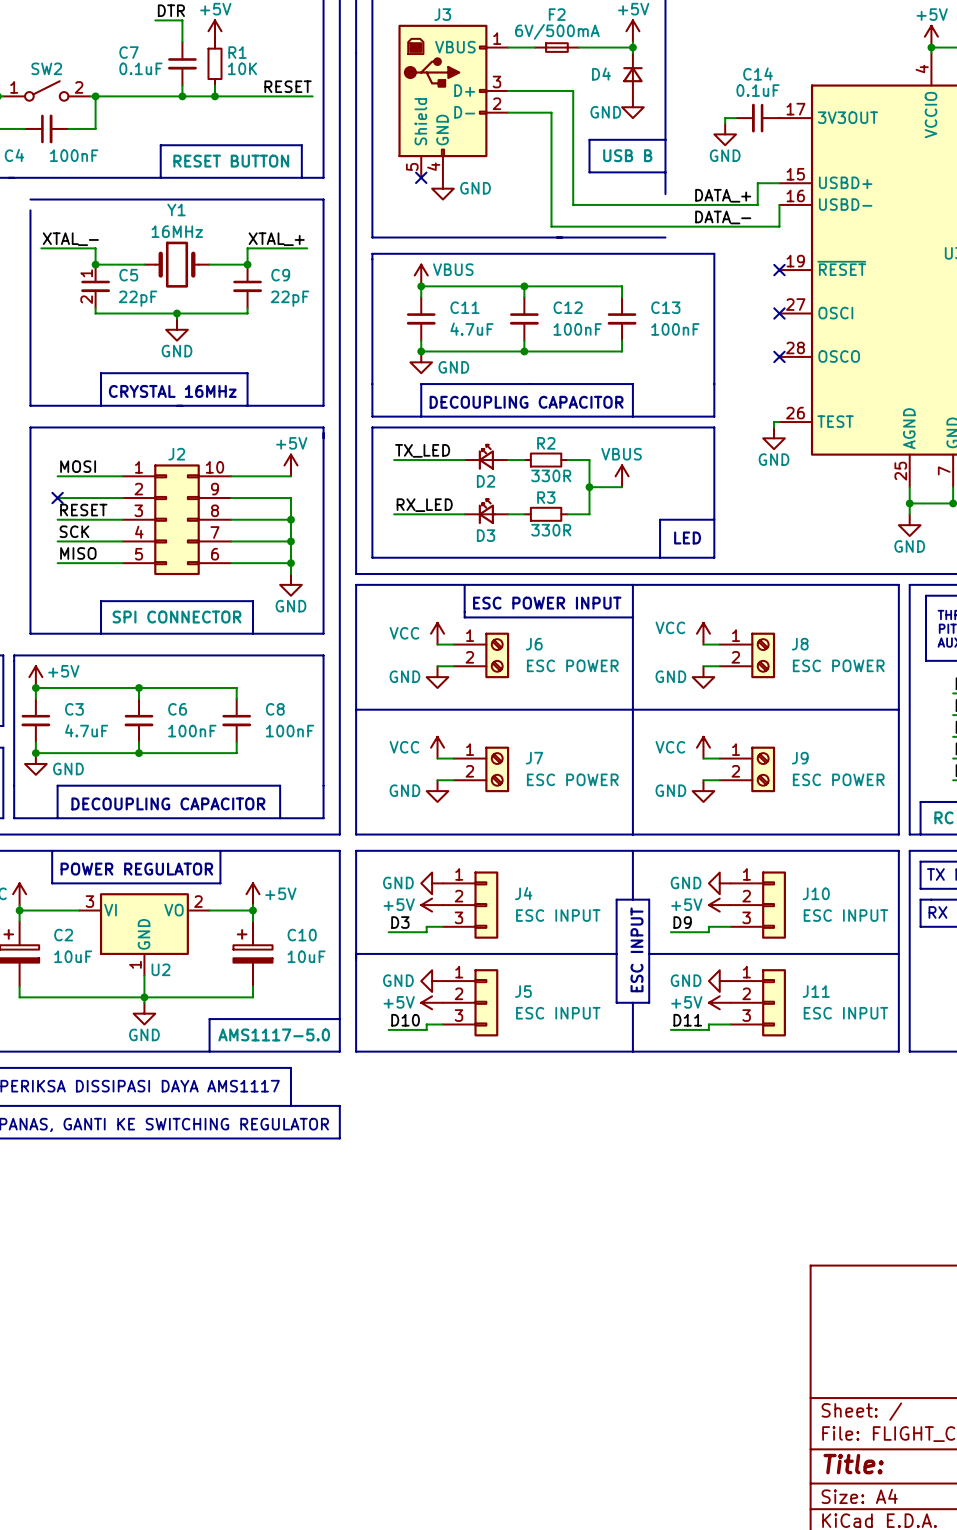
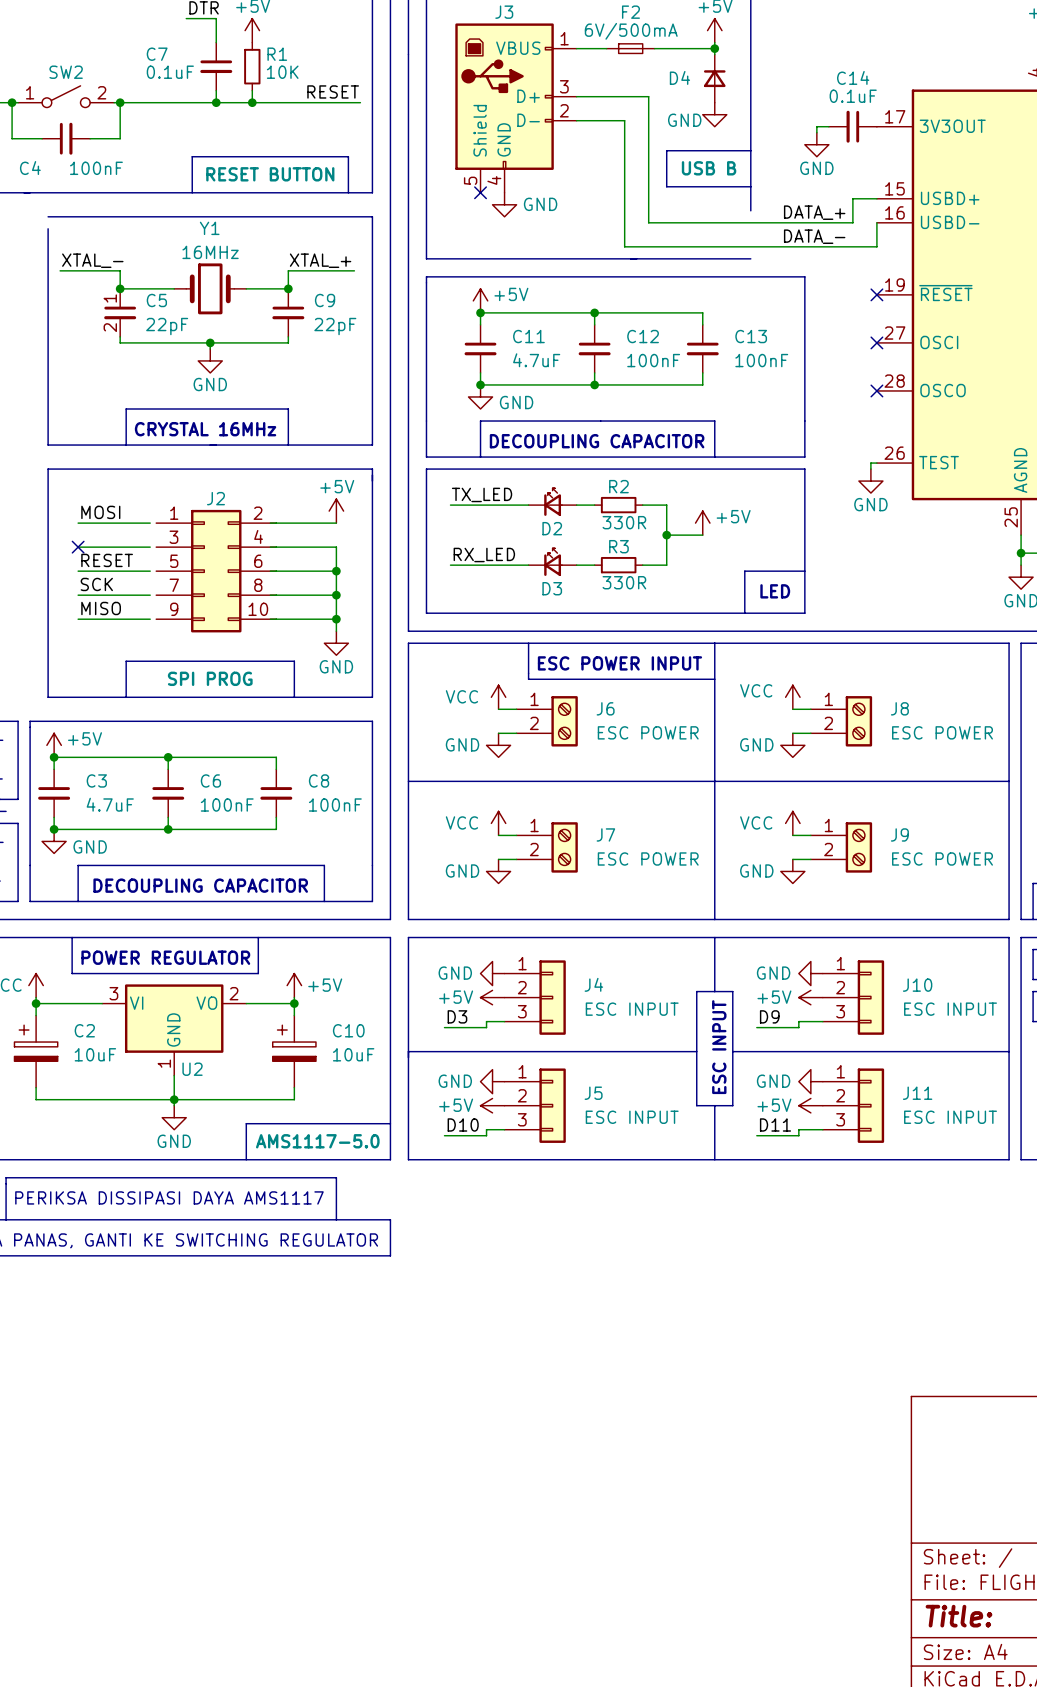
power symbol: VBUS (421, 275) -> +5V (480, 300)
J2 symbol: [122, 464, 232, 576] -> [156, 509, 277, 633]
power symbol: VBUS (622, 476) -> +5V (702, 523)
J2 value: SPI CONNECTOR (177, 617) -> SPI PROG (210, 678)

